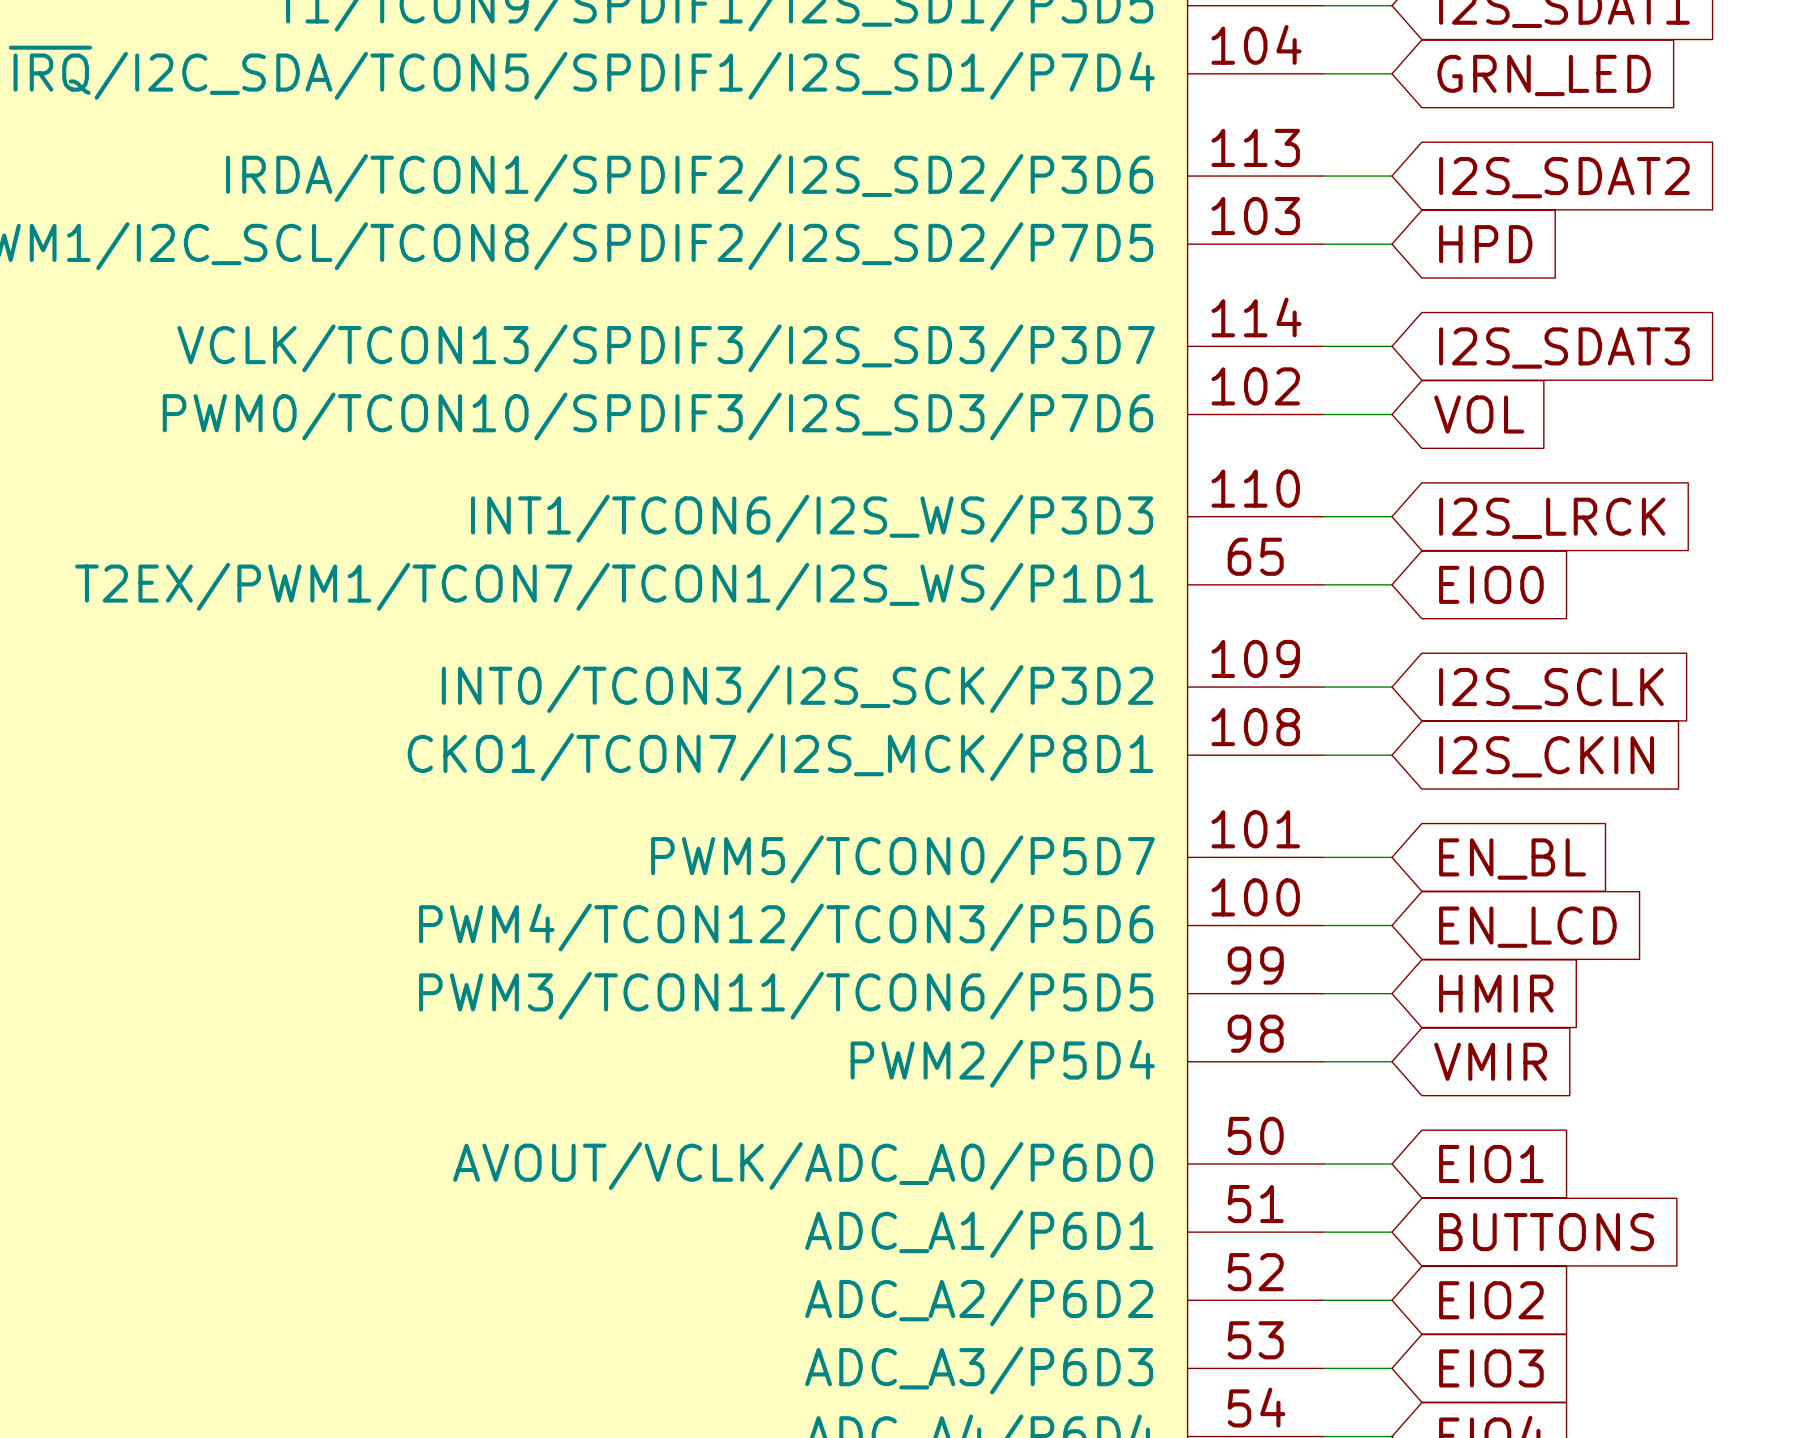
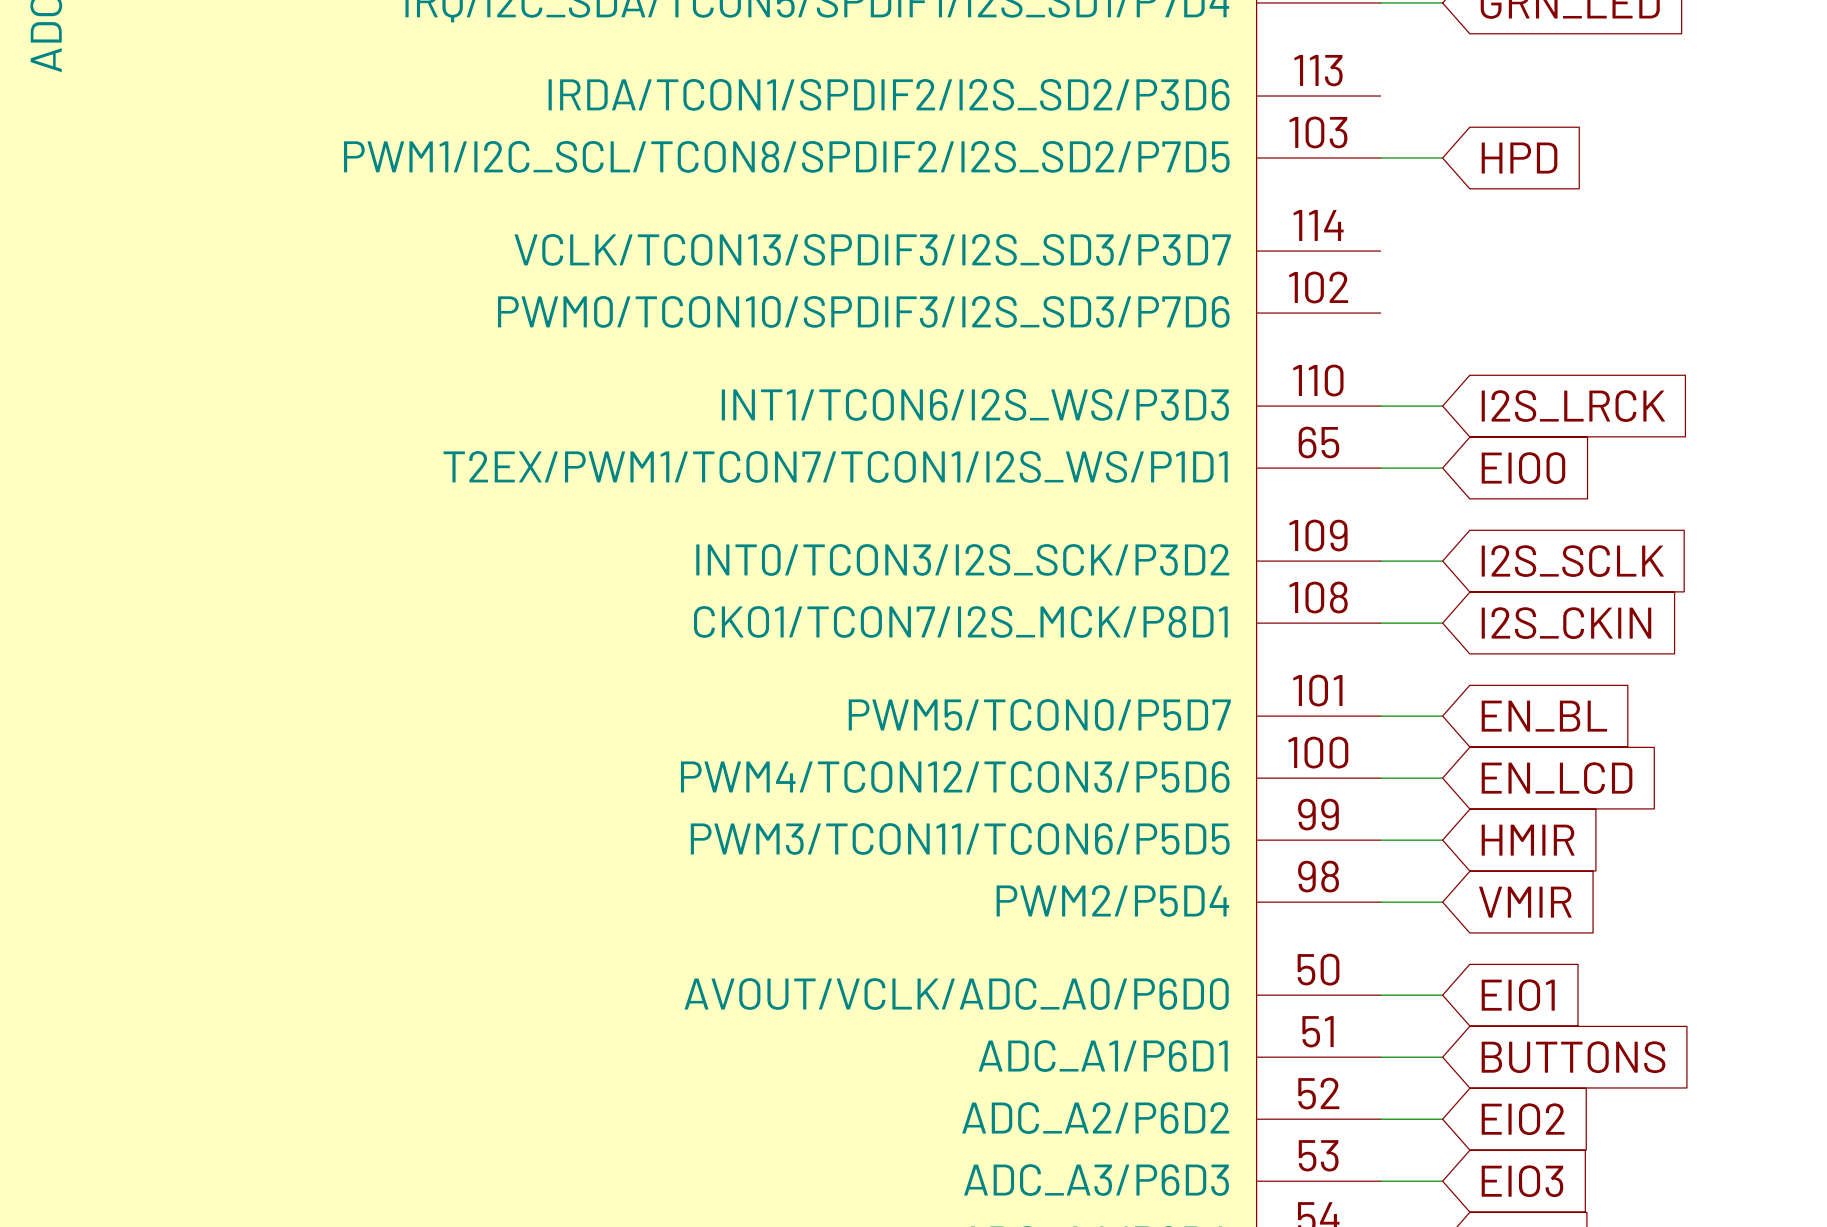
wire: (1323, 176) (1391, 176) -> none
global label: I2S_SDAT2 (1564, 177) -> none
wire: (1323, 346) (1391, 346) -> none
global label: I2S_SDAT3 (1564, 347) -> none
wire: (1323, 414) (1391, 414) -> none
global label: VOL (1479, 414) -> none

